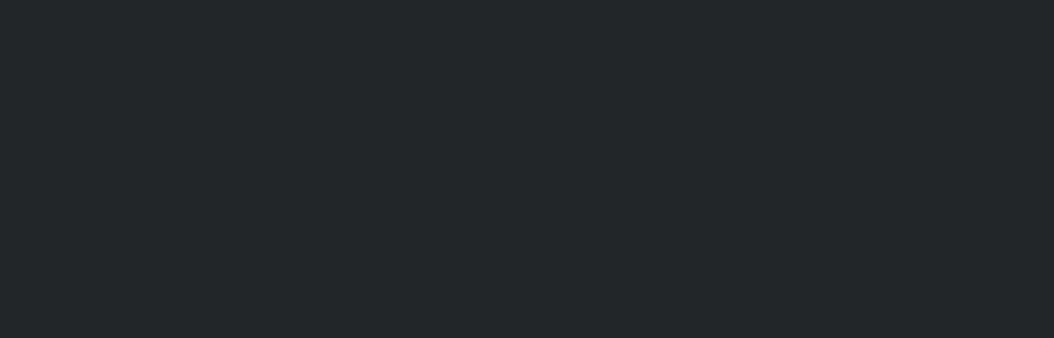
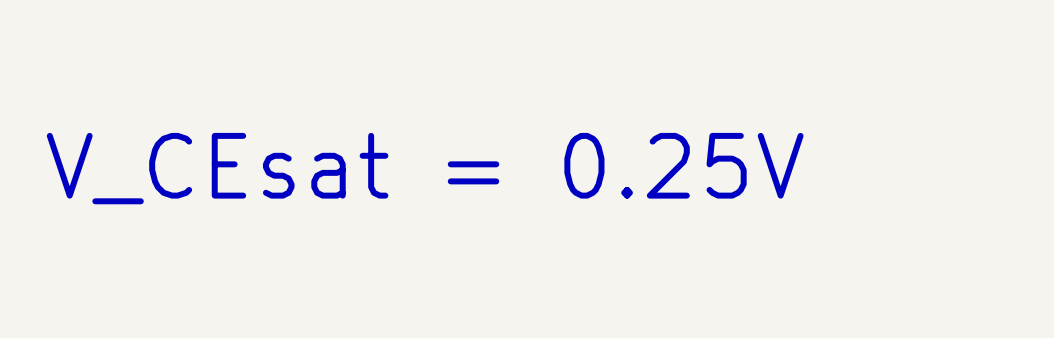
text: none -> V_CEsat = 0.25V (425, 168)

